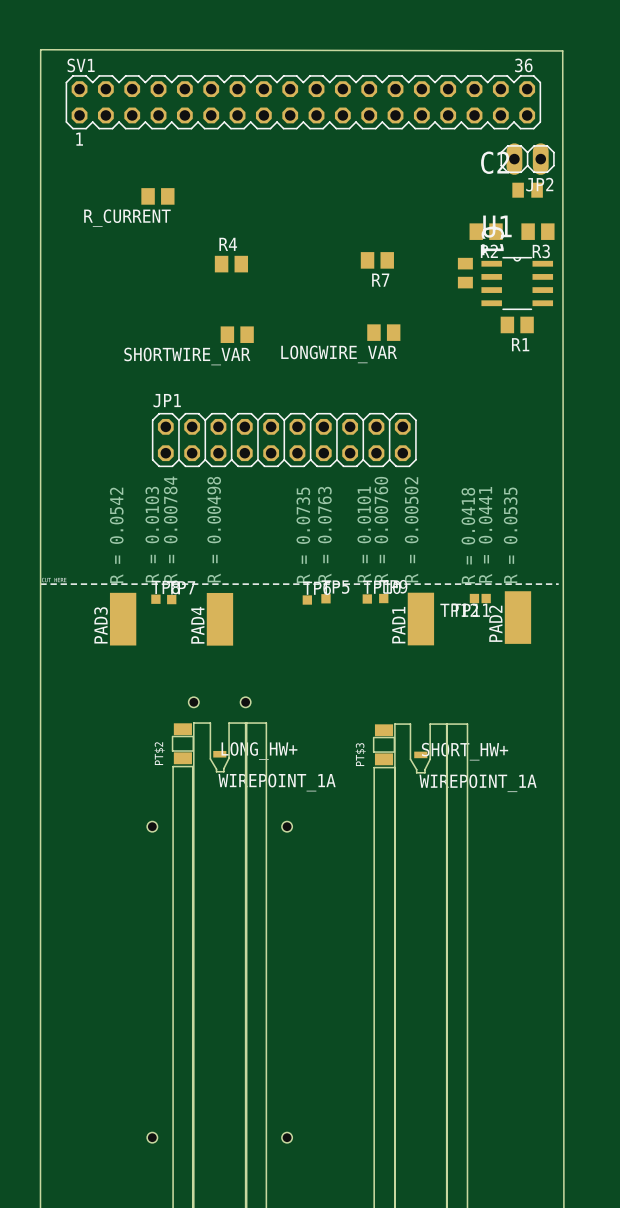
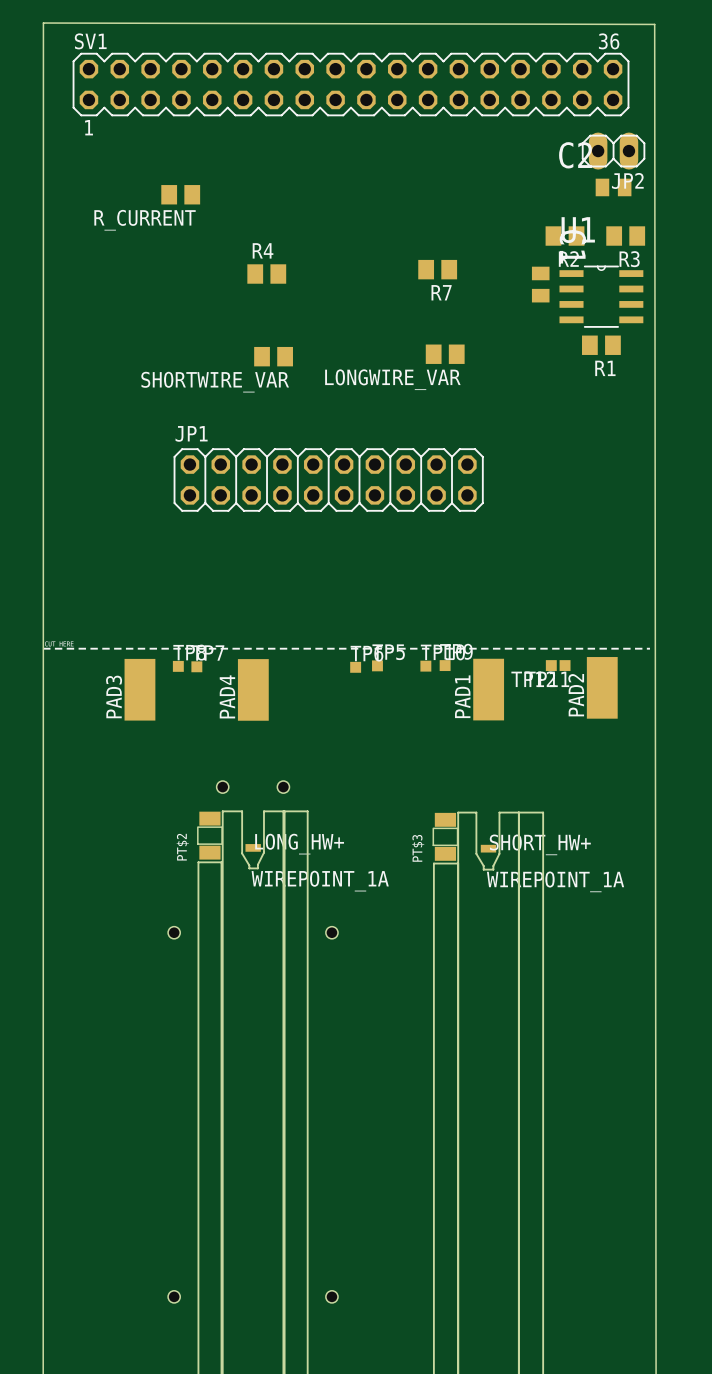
text: R = 0.00784 (170, 529) -> none
text: R = 0.00498 (214, 529) -> none
text: R = 0.00760 (381, 529) -> none
text: R = 0.00502 (411, 529) -> none
text: R = 0.0103 (152, 534) -> none
text: R = 0.0763 (324, 534) -> none
text: R = 0.0101 (364, 534) -> none
text: R = 0.0441 (485, 534) -> none
text: R = 0.0542 (116, 535) -> none
text: R = 0.0735 (303, 535) -> none
text: R = 0.0418 (468, 535) -> none
text: R = 0.0535 (510, 535) -> none

